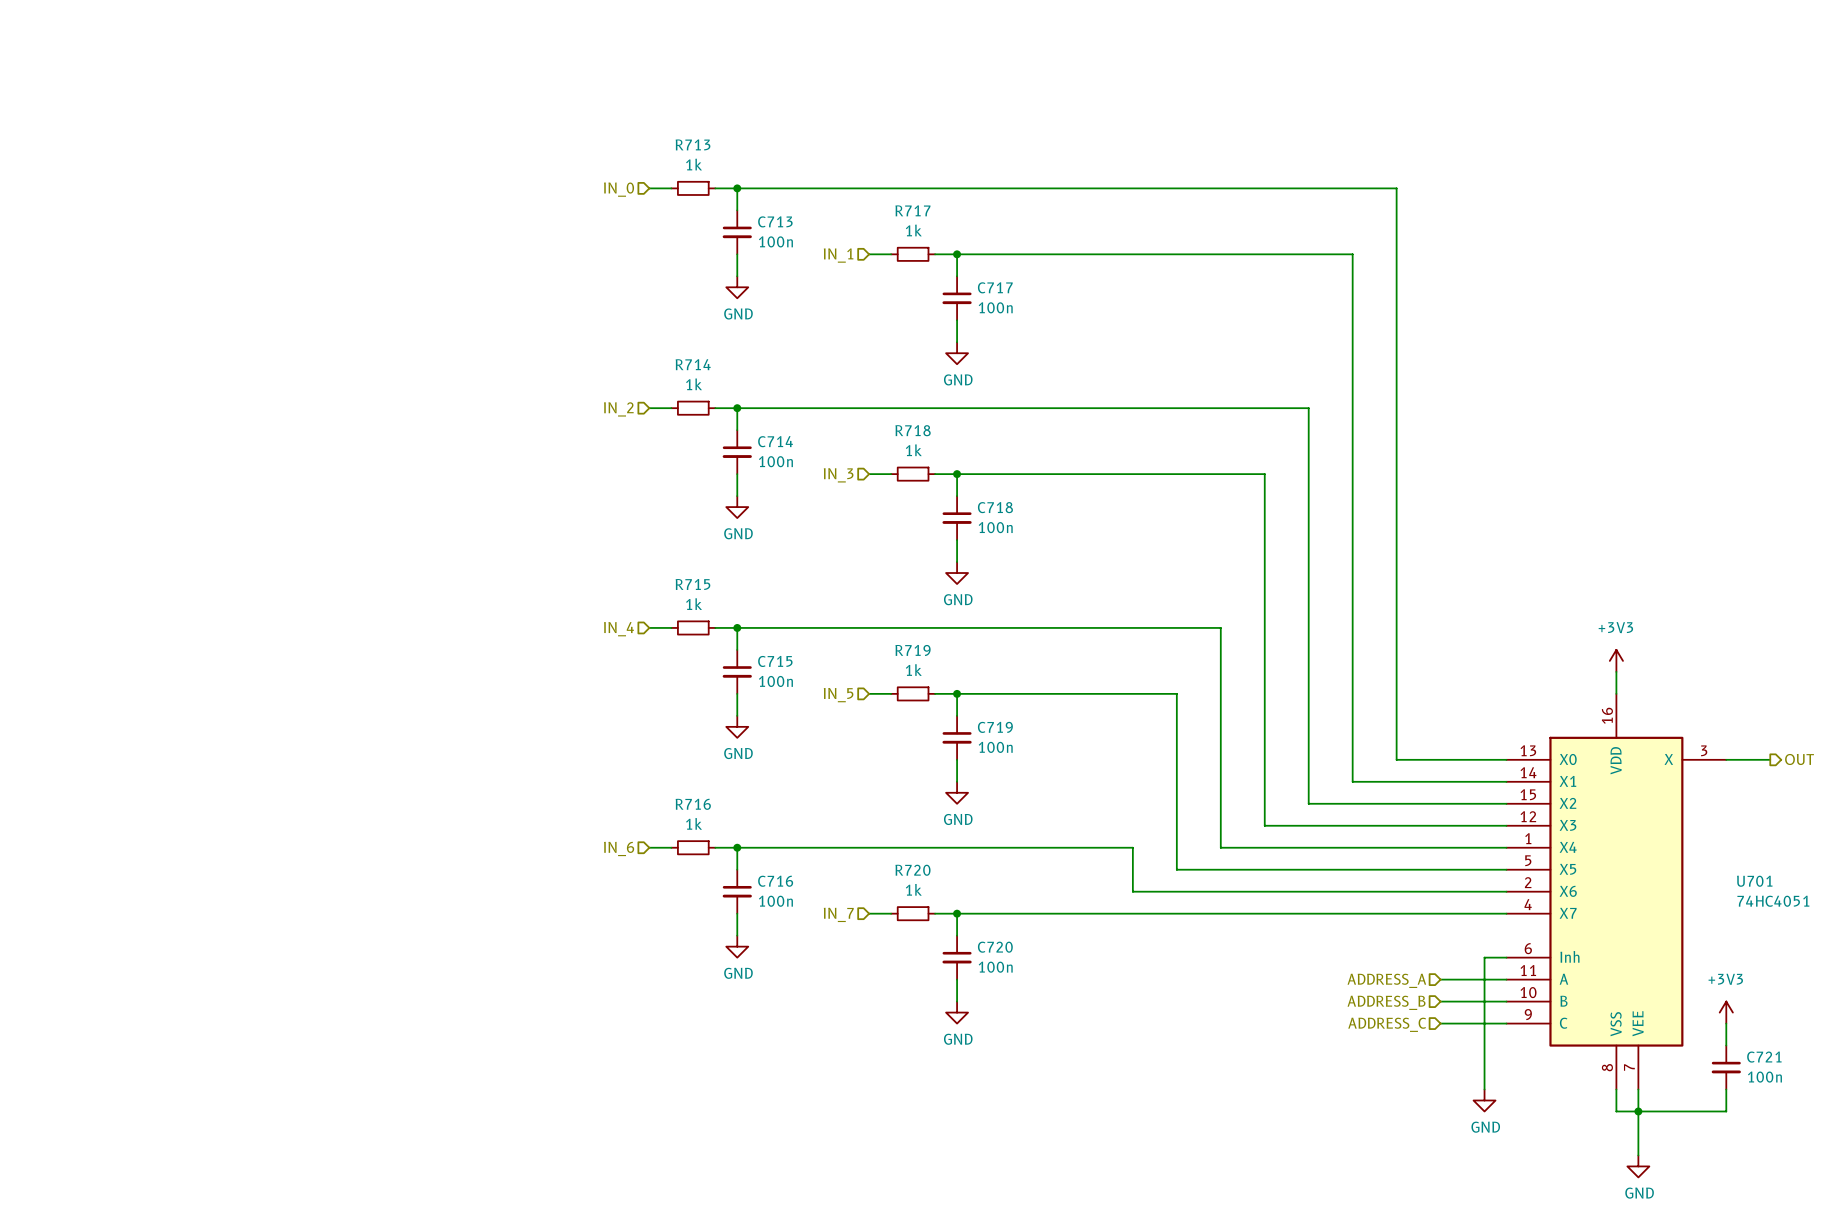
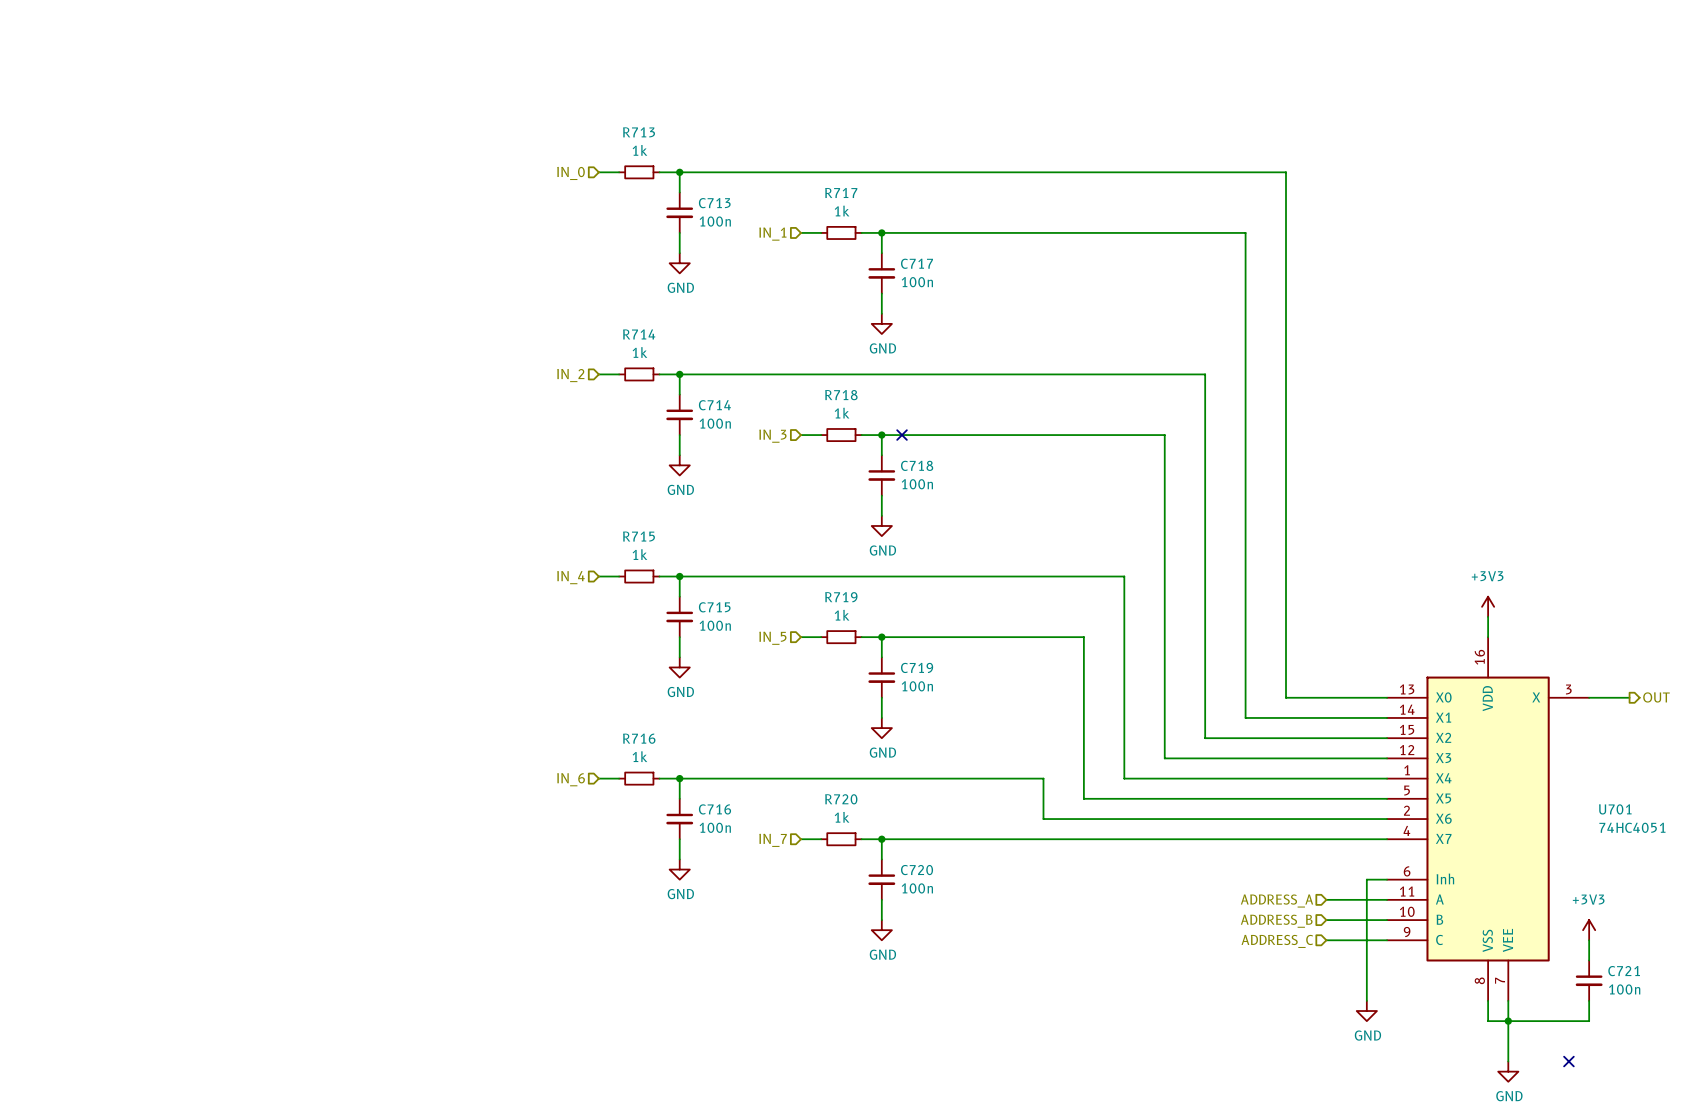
no-connect mark: none -> (902, 435)
no-connect mark: none -> (1568, 1061)

